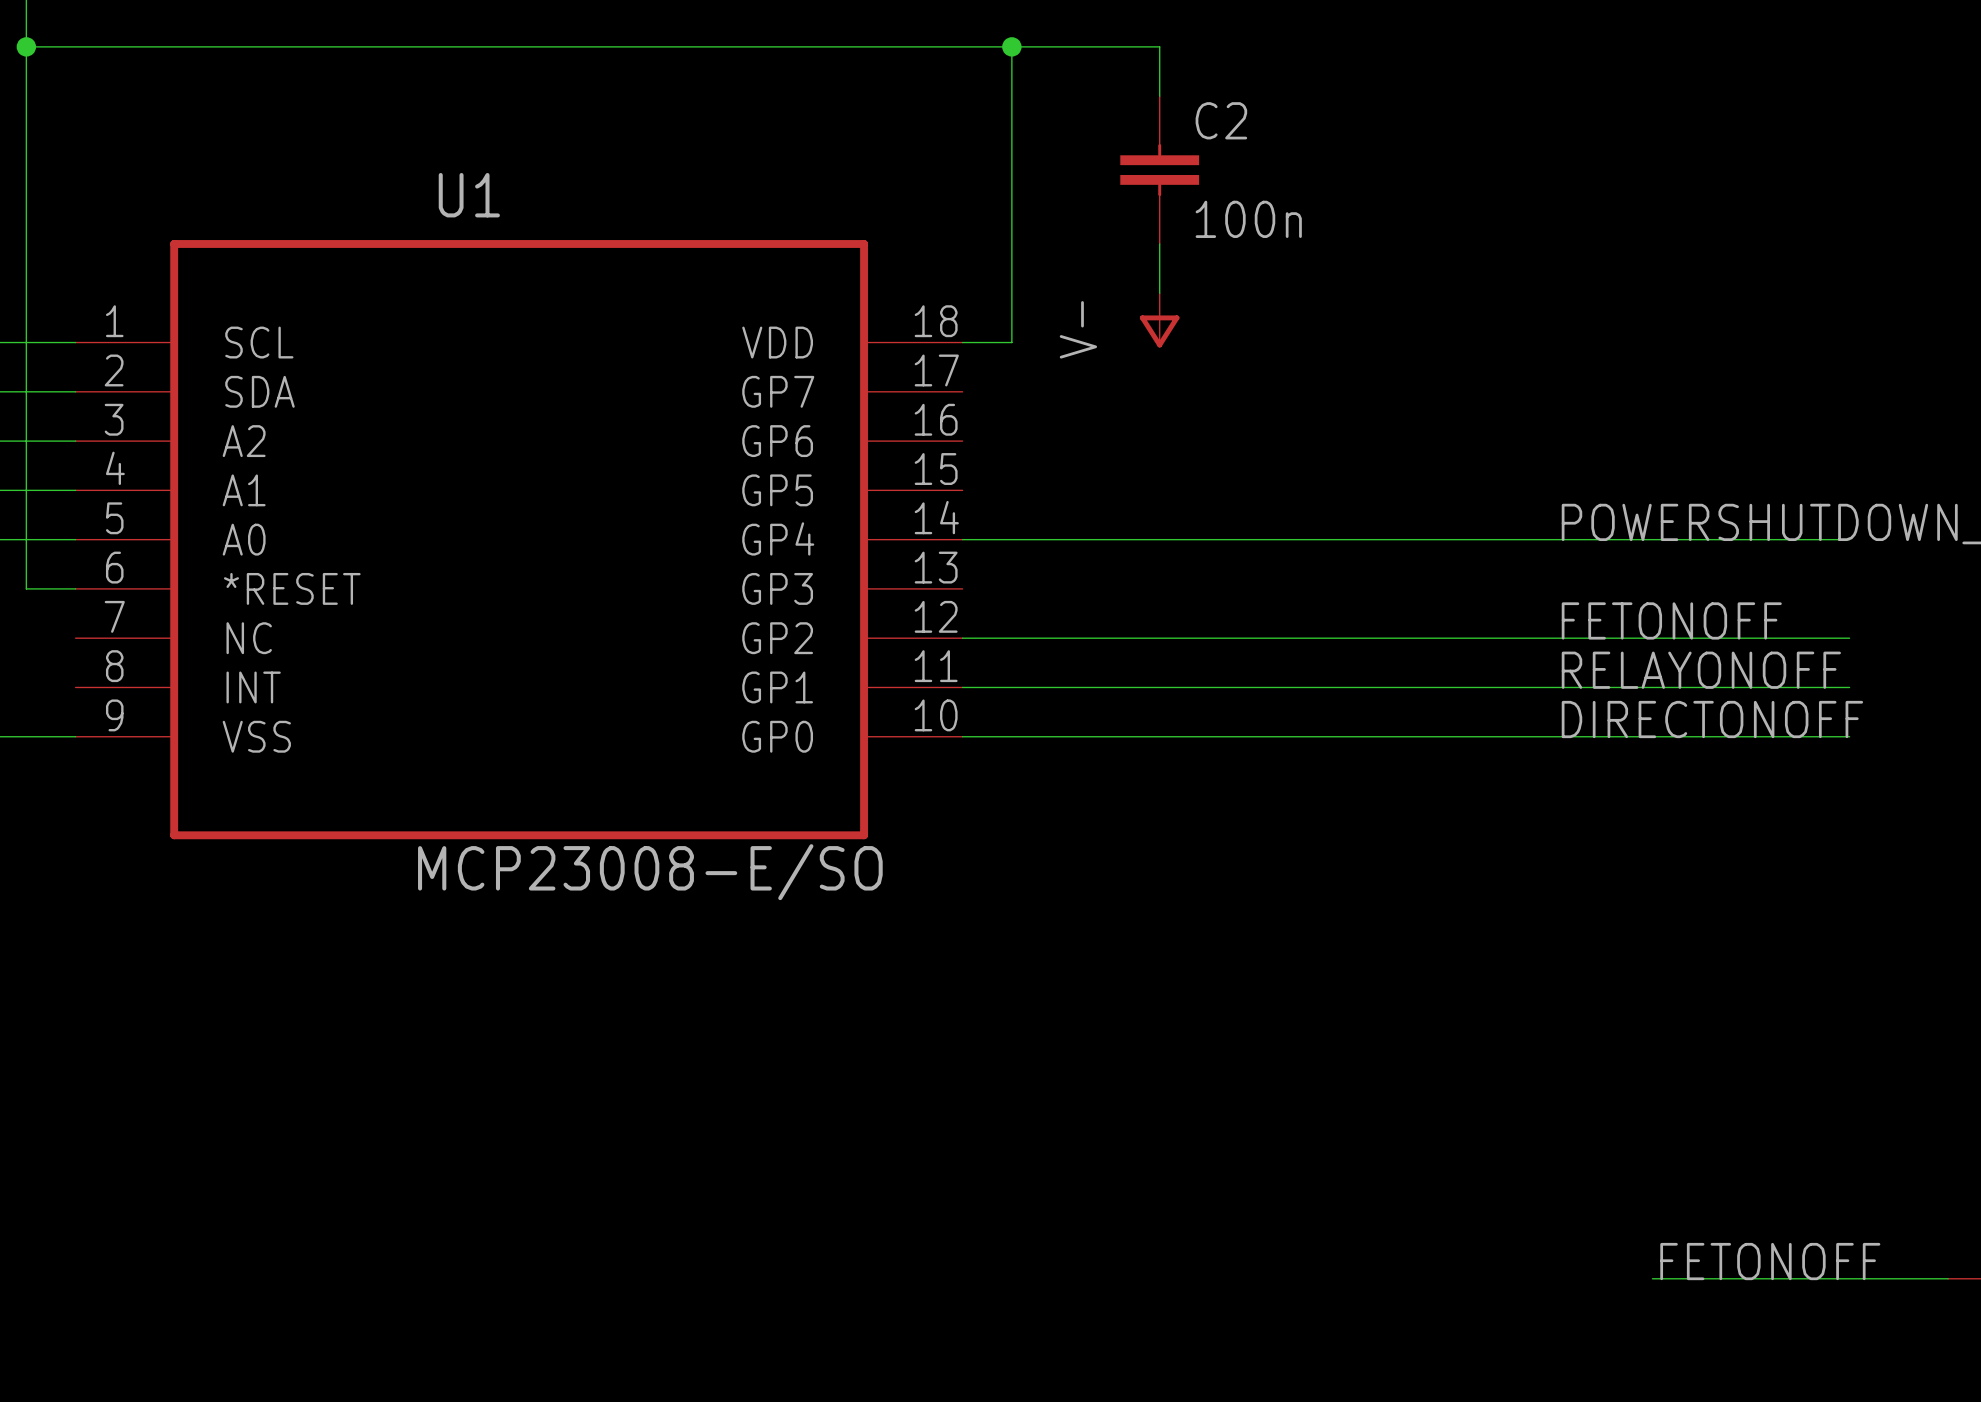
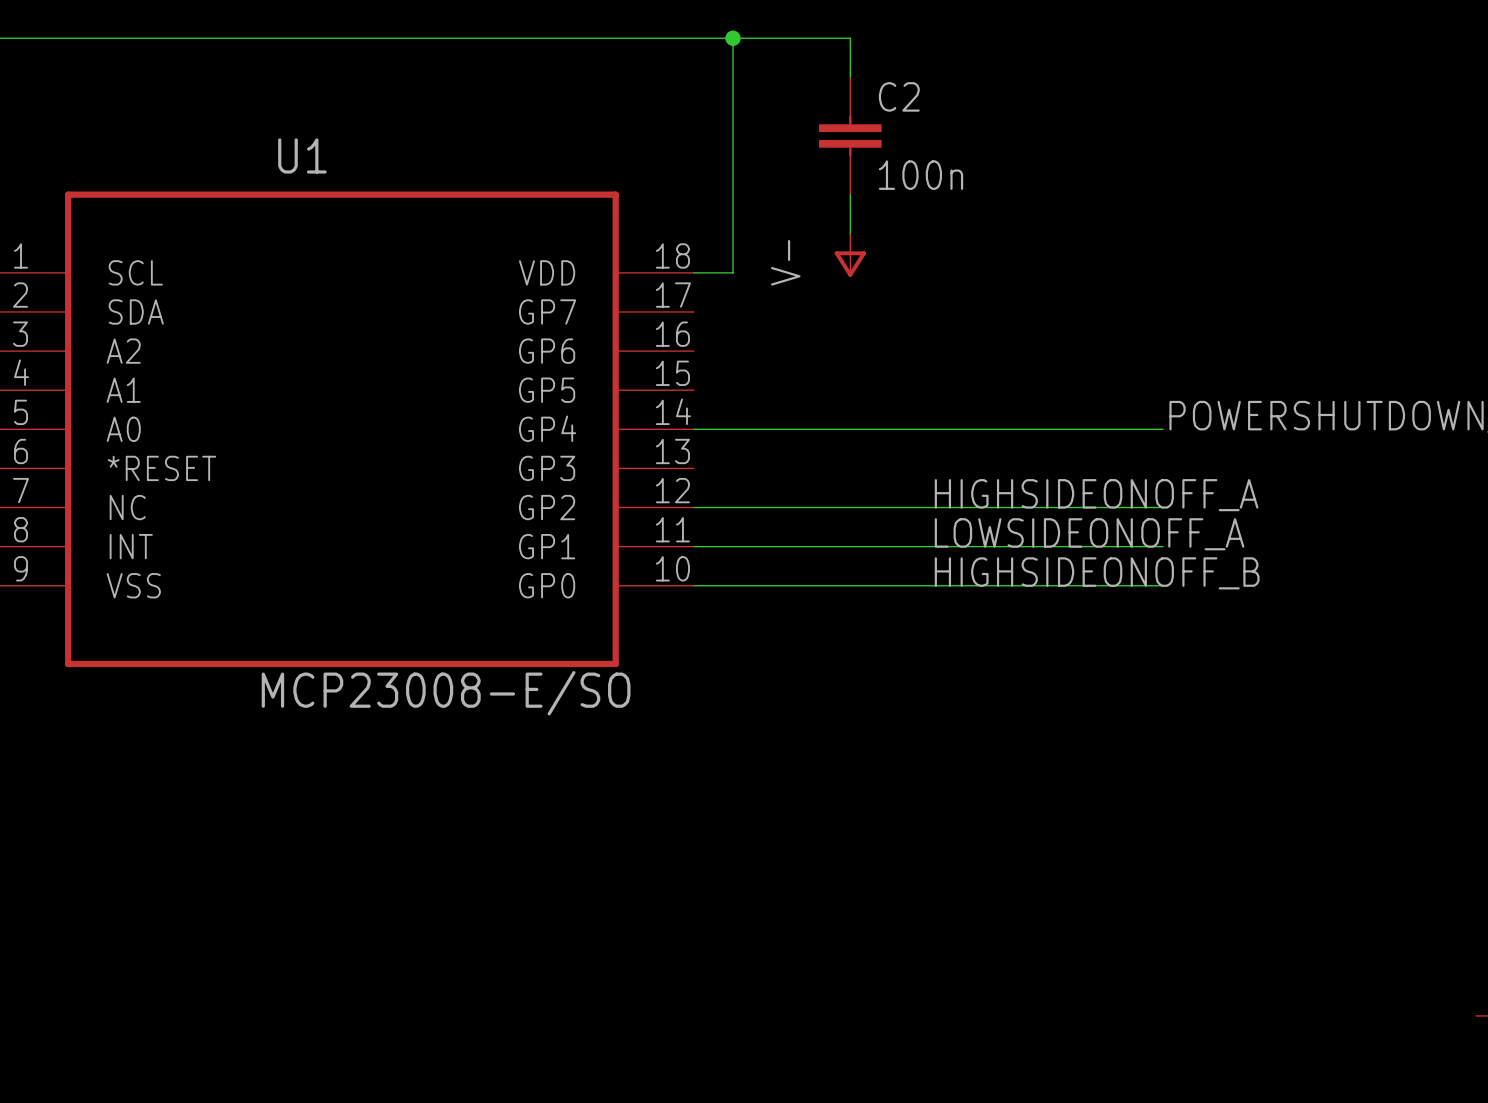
wire: (1553, 539) (1849, 539) -> none
label: FETONOFF (1671, 620) -> none
label: none -> HIGHSIDEONOFF_A (1096, 495)
wire: (1553, 638) (1849, 638) -> none
label: RELAYONOFF (1701, 670) -> none
label: none -> LOWSIDEONOFF_A (1089, 534)
wire: (1553, 687) (1849, 687) -> none
label: DIRECTONOFF (1712, 719) -> none
label: none -> HIGHSIDEONOFF_B (1097, 573)
wire: (1553, 736) (1849, 736) -> none
label: FETONOFF (1770, 1261) -> none
wire: (1652, 1278) (1948, 1278) -> none

